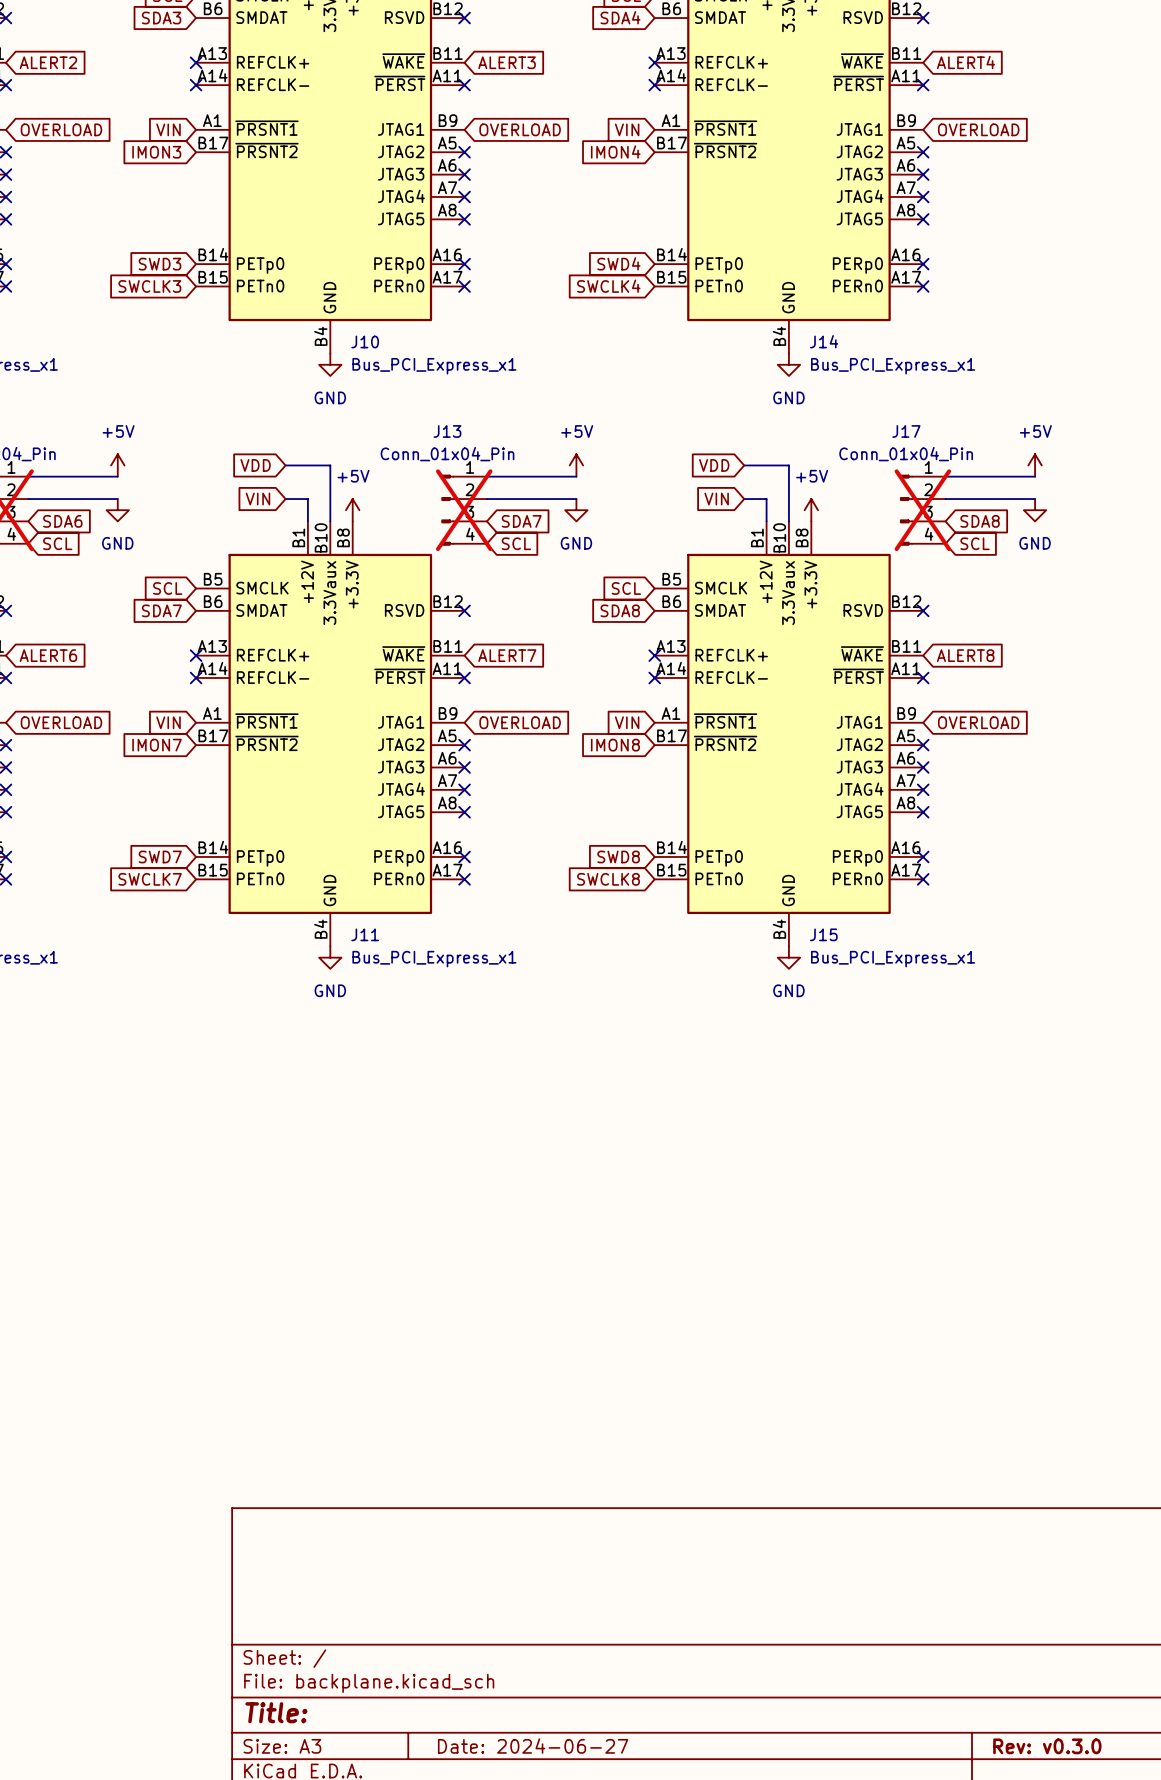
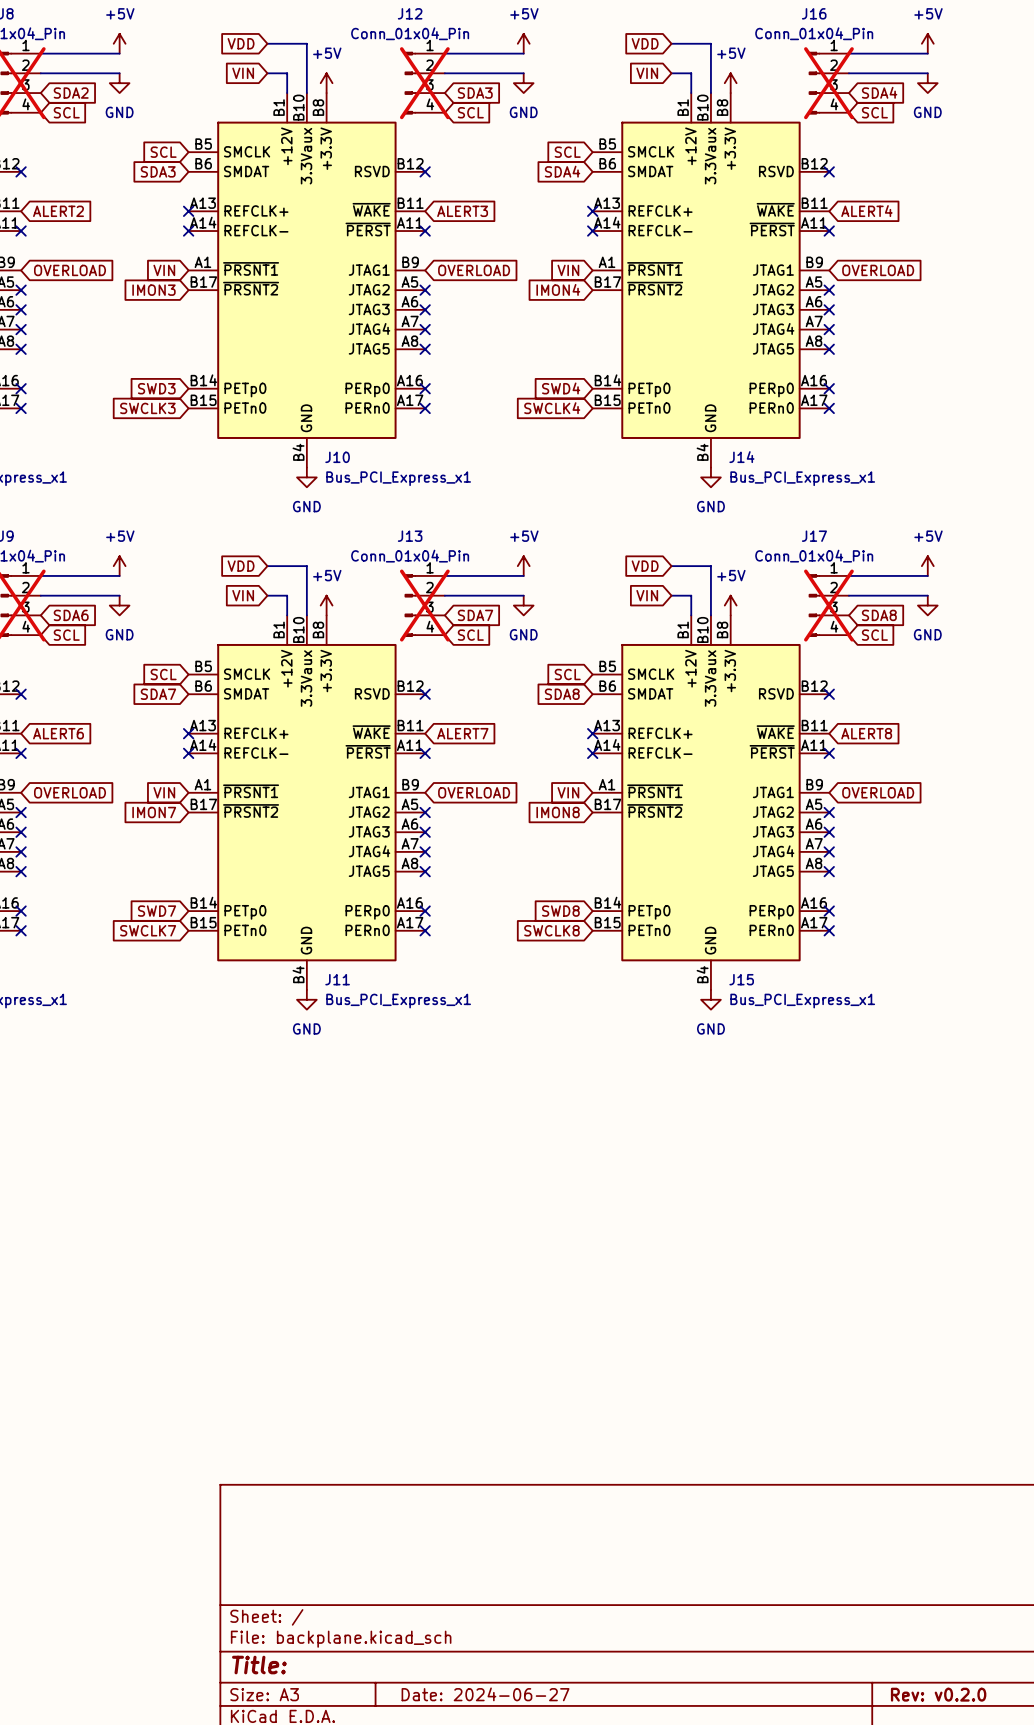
title block: Rev: v0.3.0 (1047, 1746) -> Rev: v0.2.0 (938, 1694)

